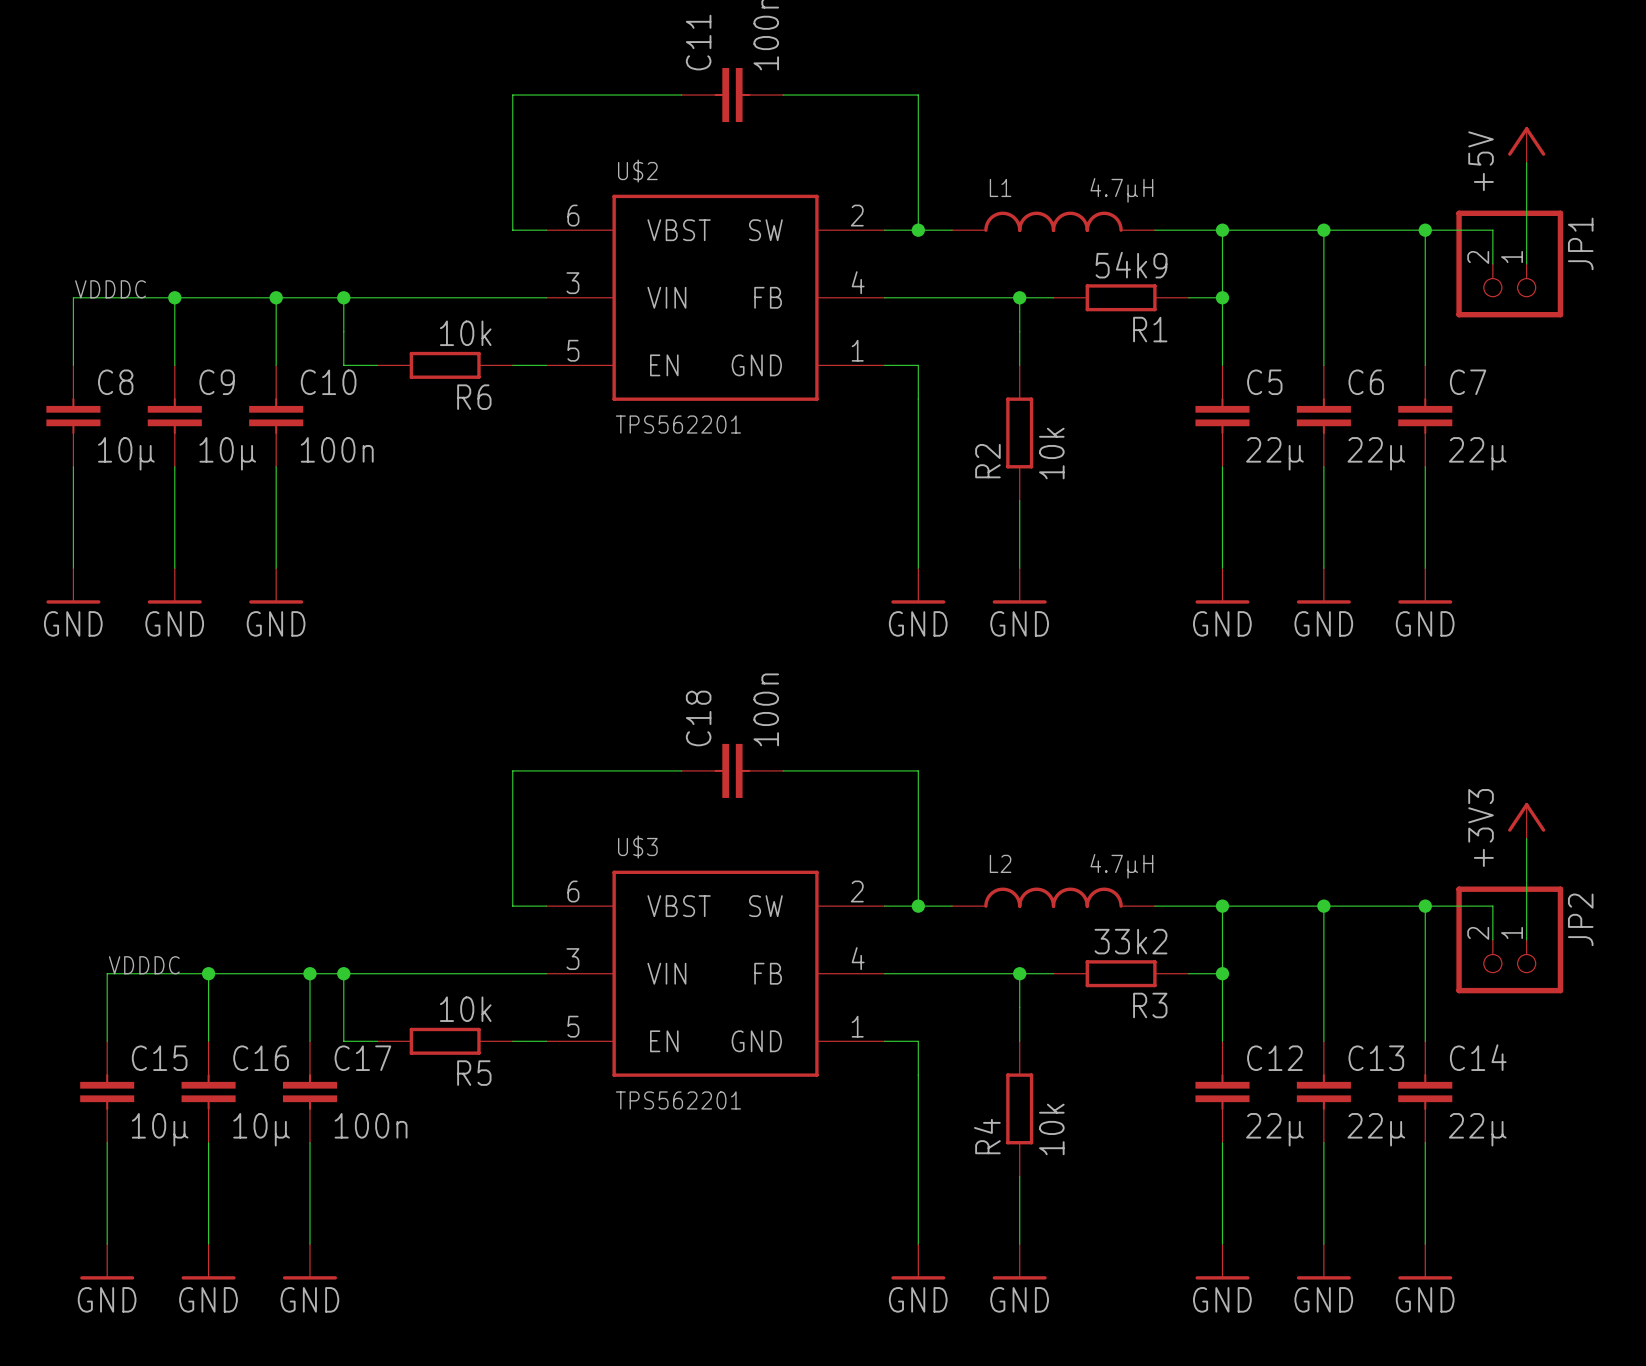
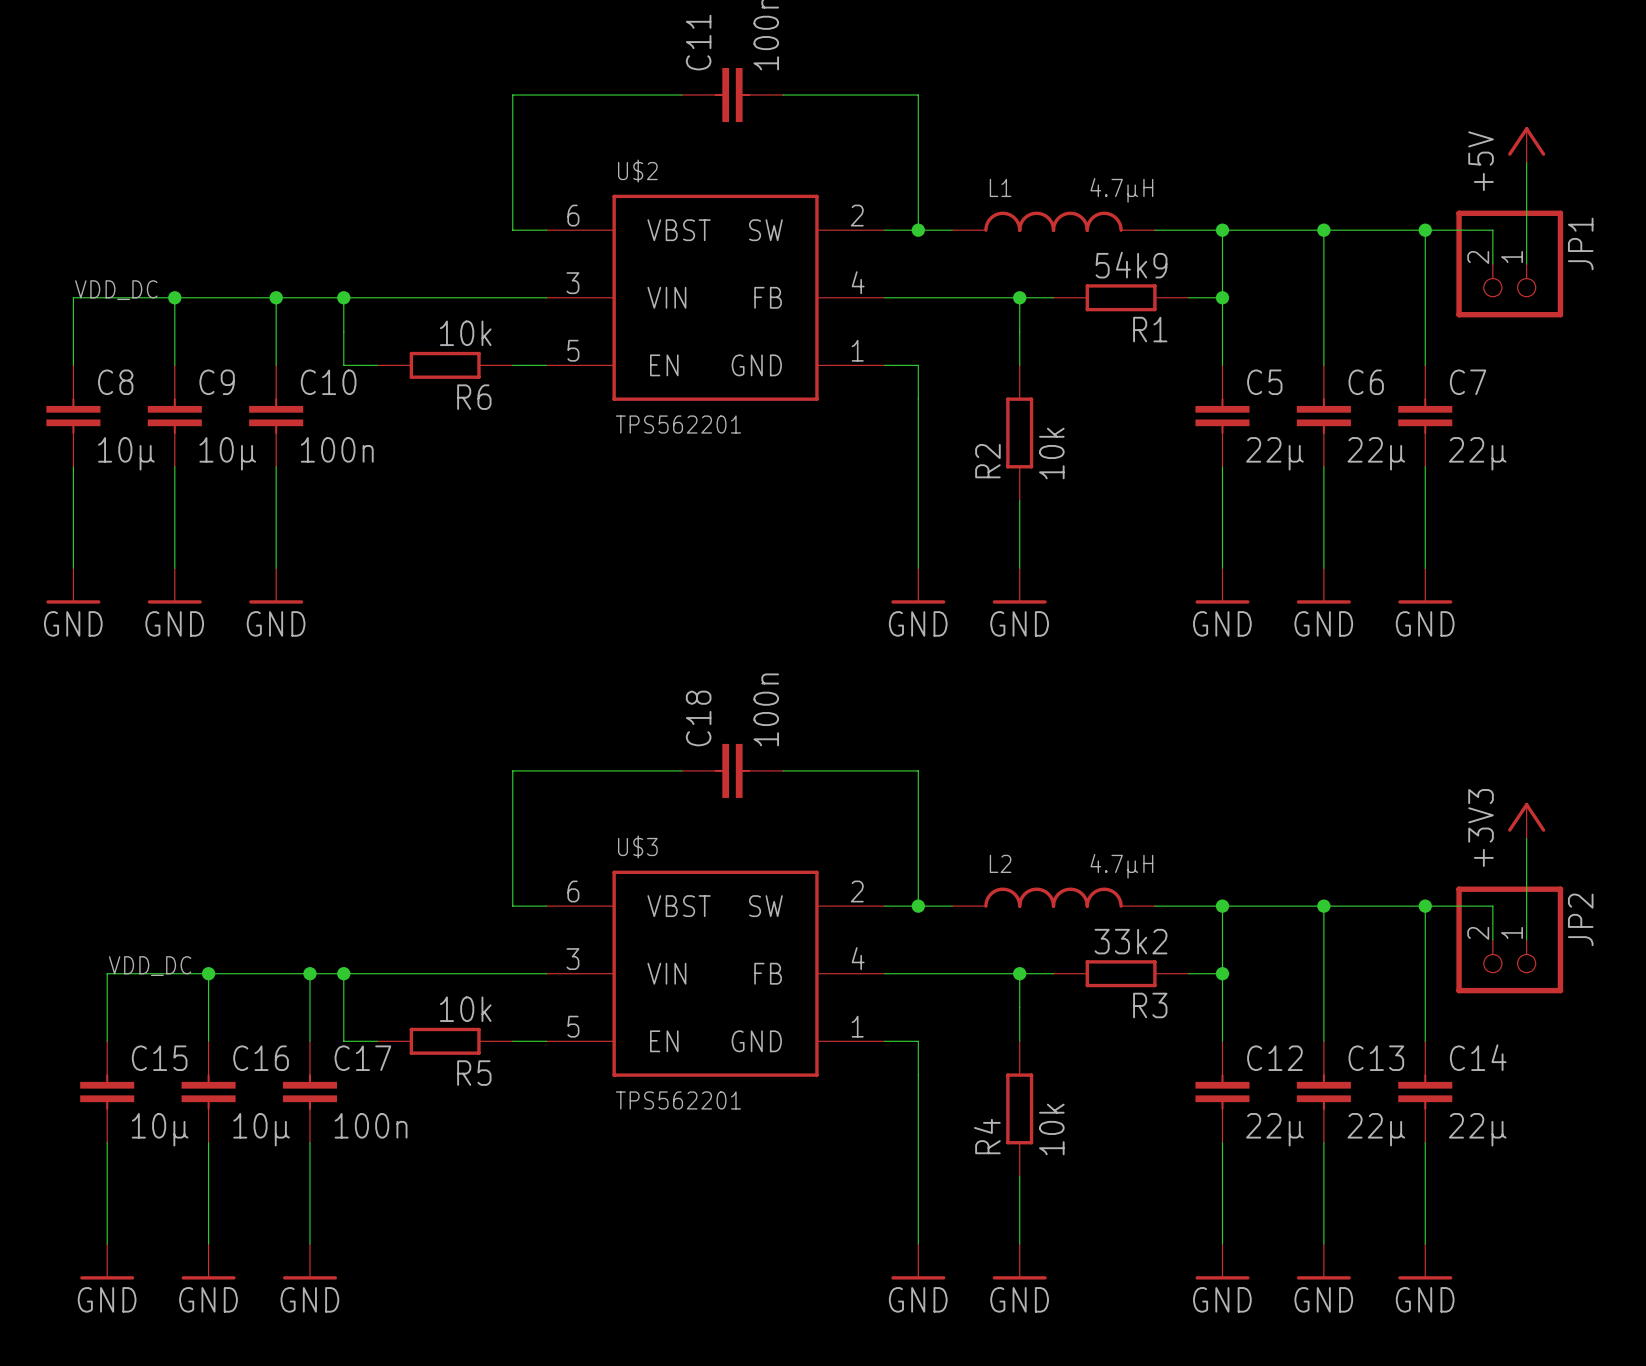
label: VDDDC (110, 289) -> VDD_DC (116, 290)
label: VDDDC (144, 965) -> VDD_DC (150, 966)

